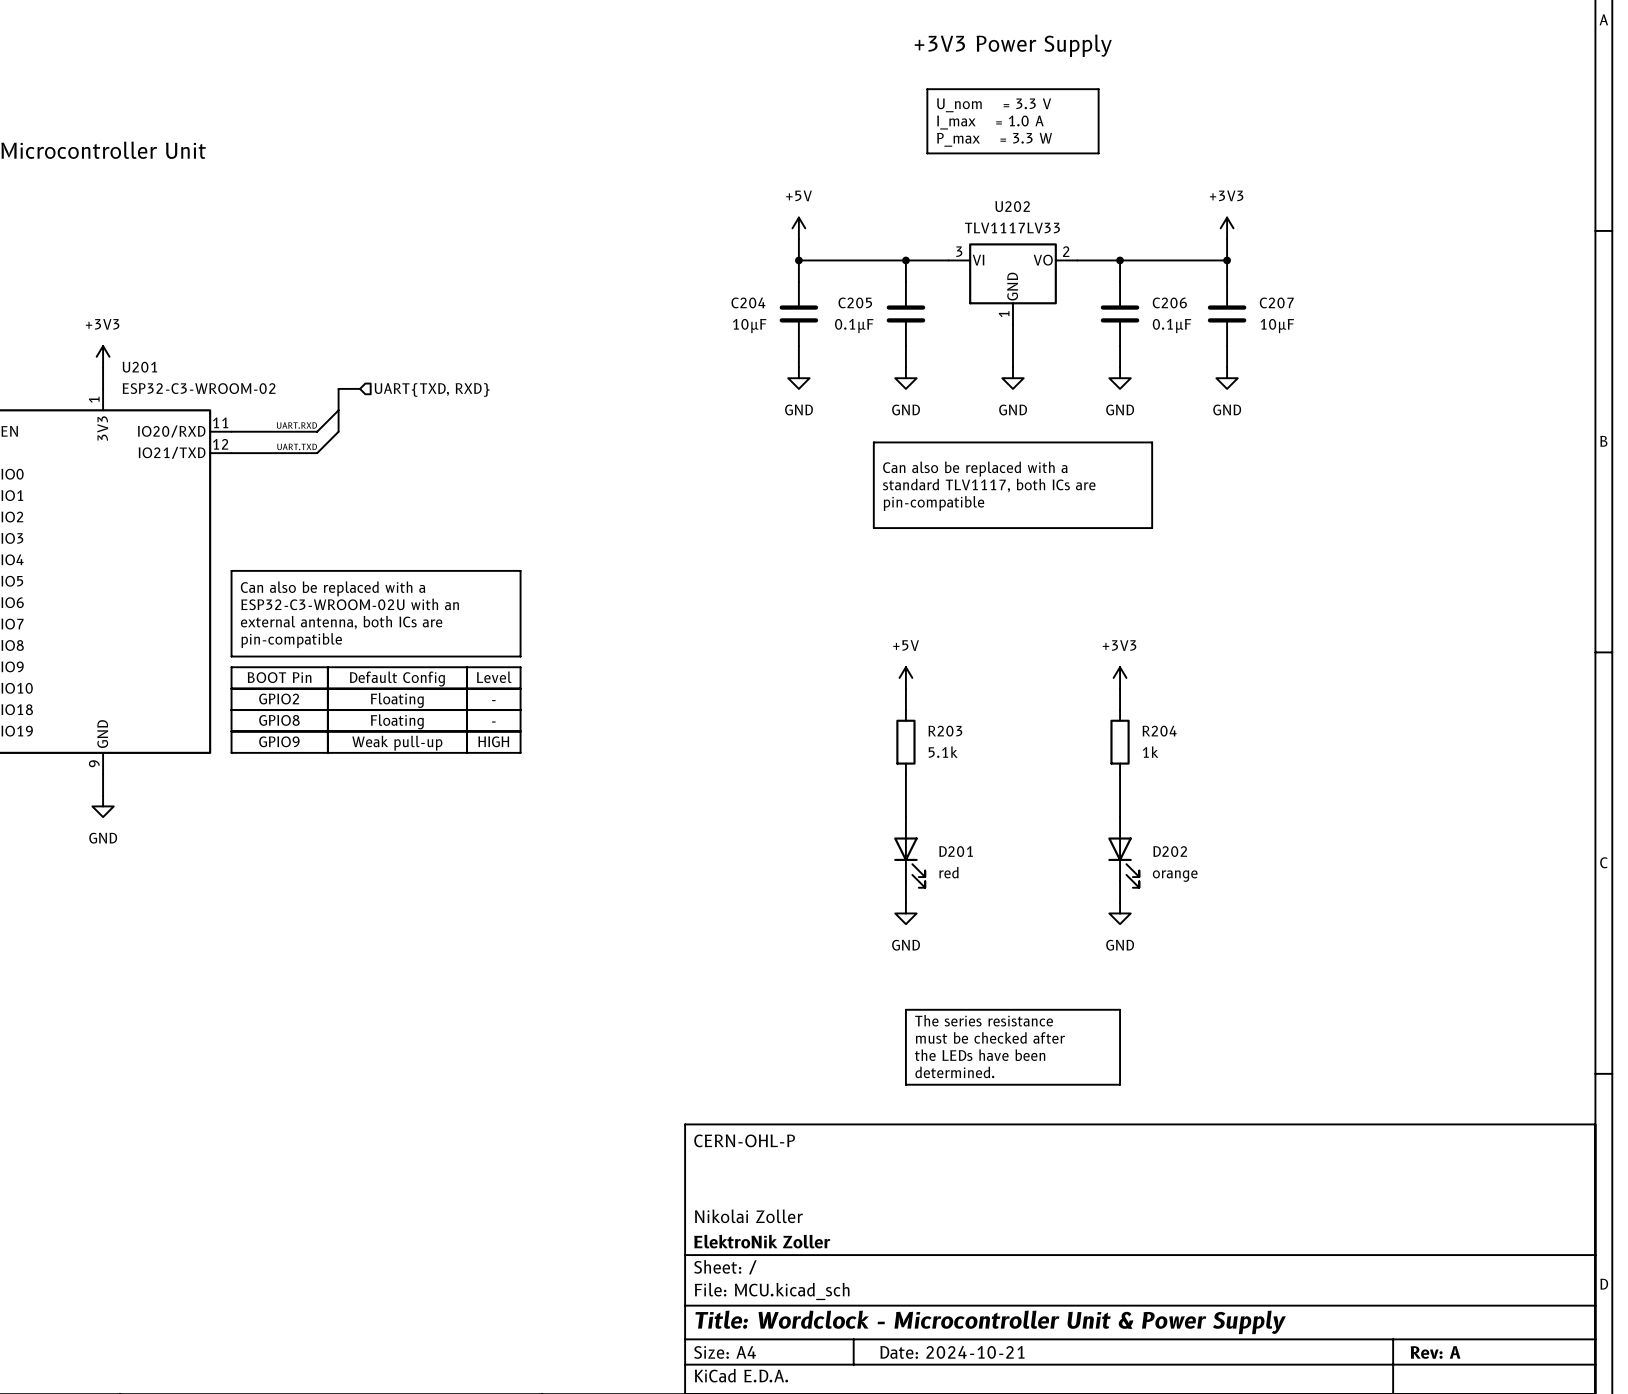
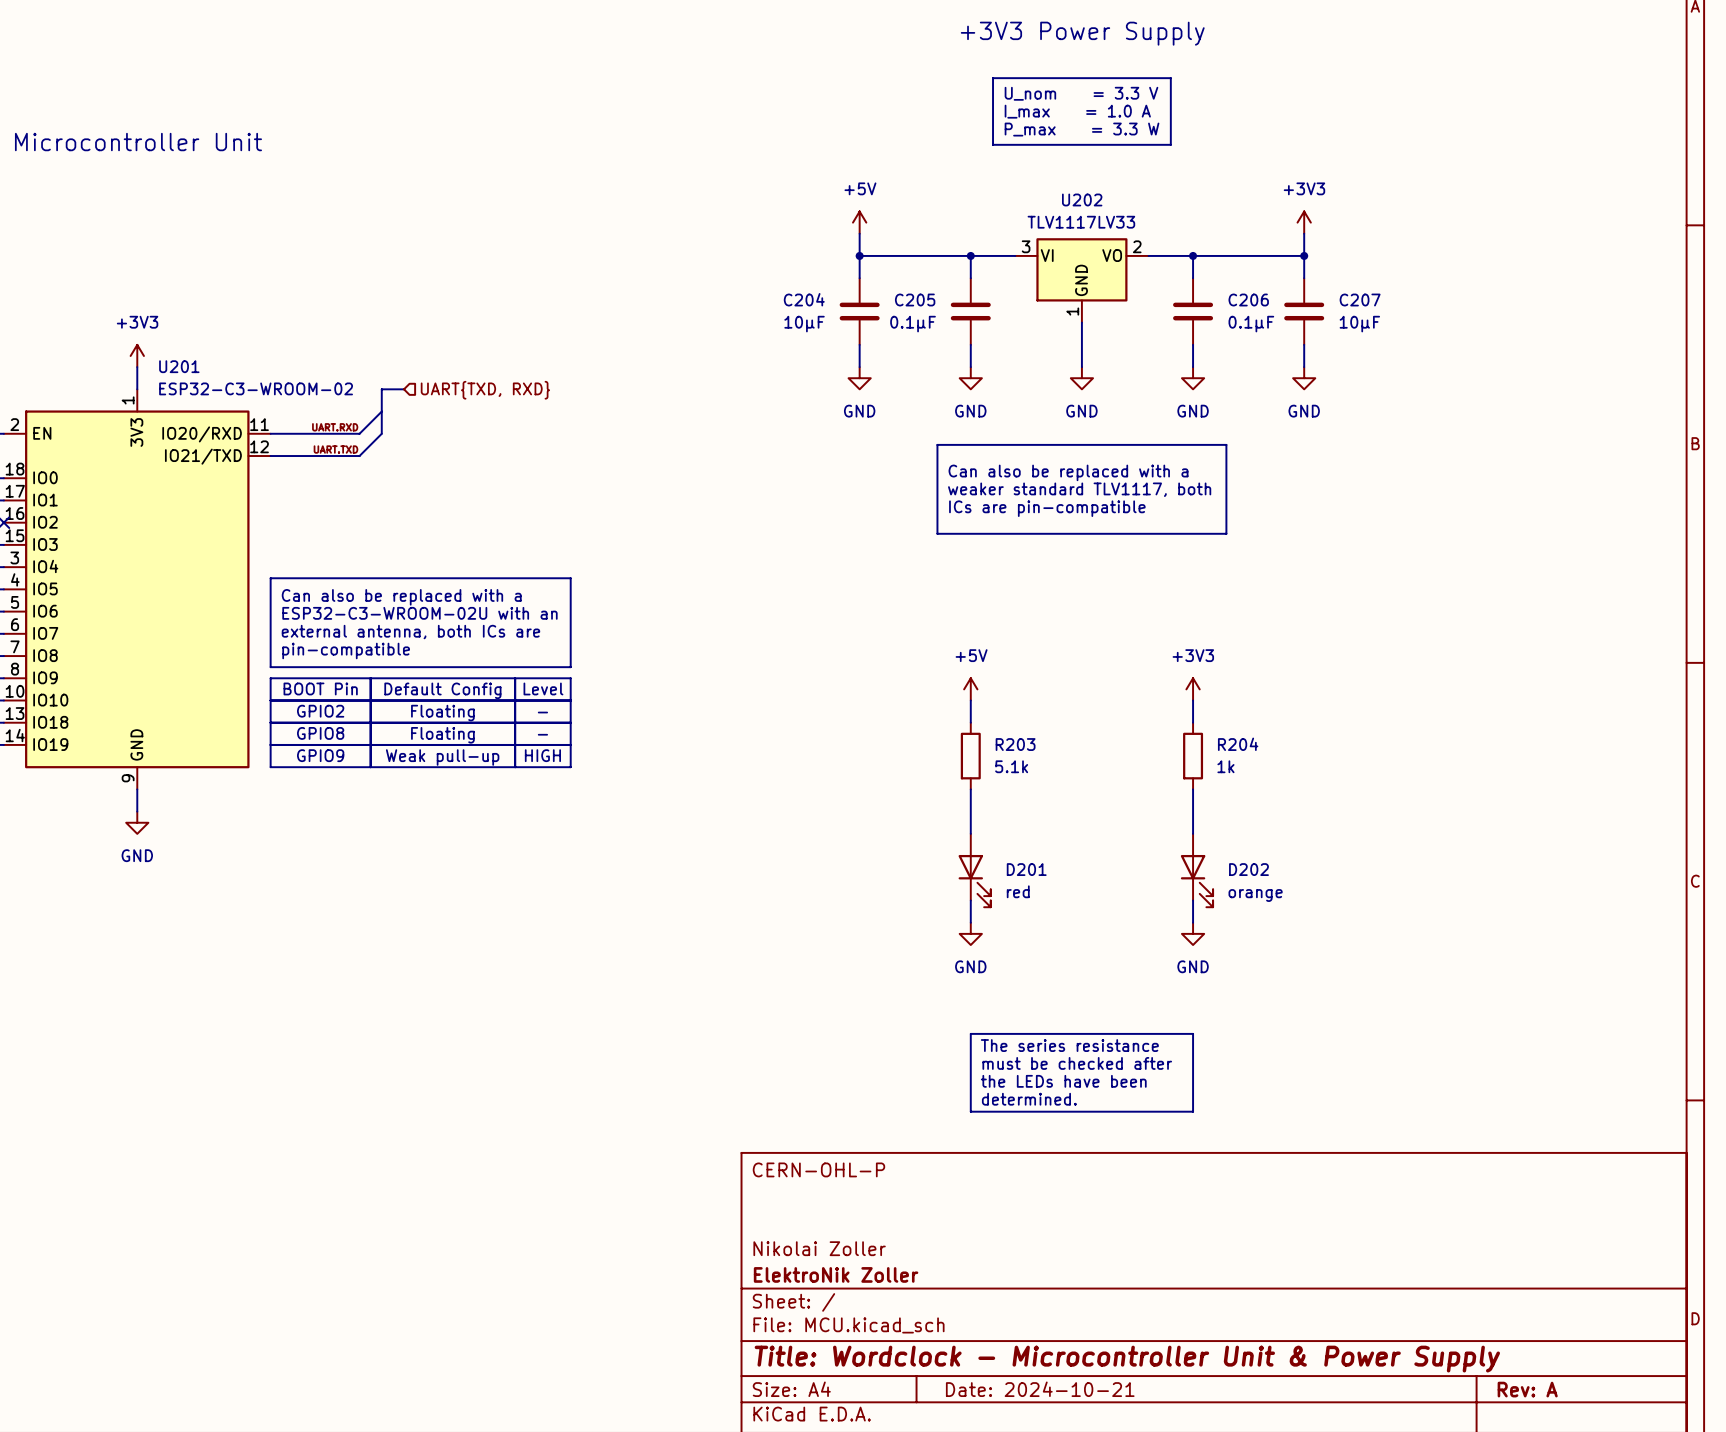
text: standard TLV1117, both ICs are (989, 485) -> weaker standard TLV1117, both (1079, 489)
text: pin-compatible (934, 503) -> ICs are pin-compatible (1047, 508)

